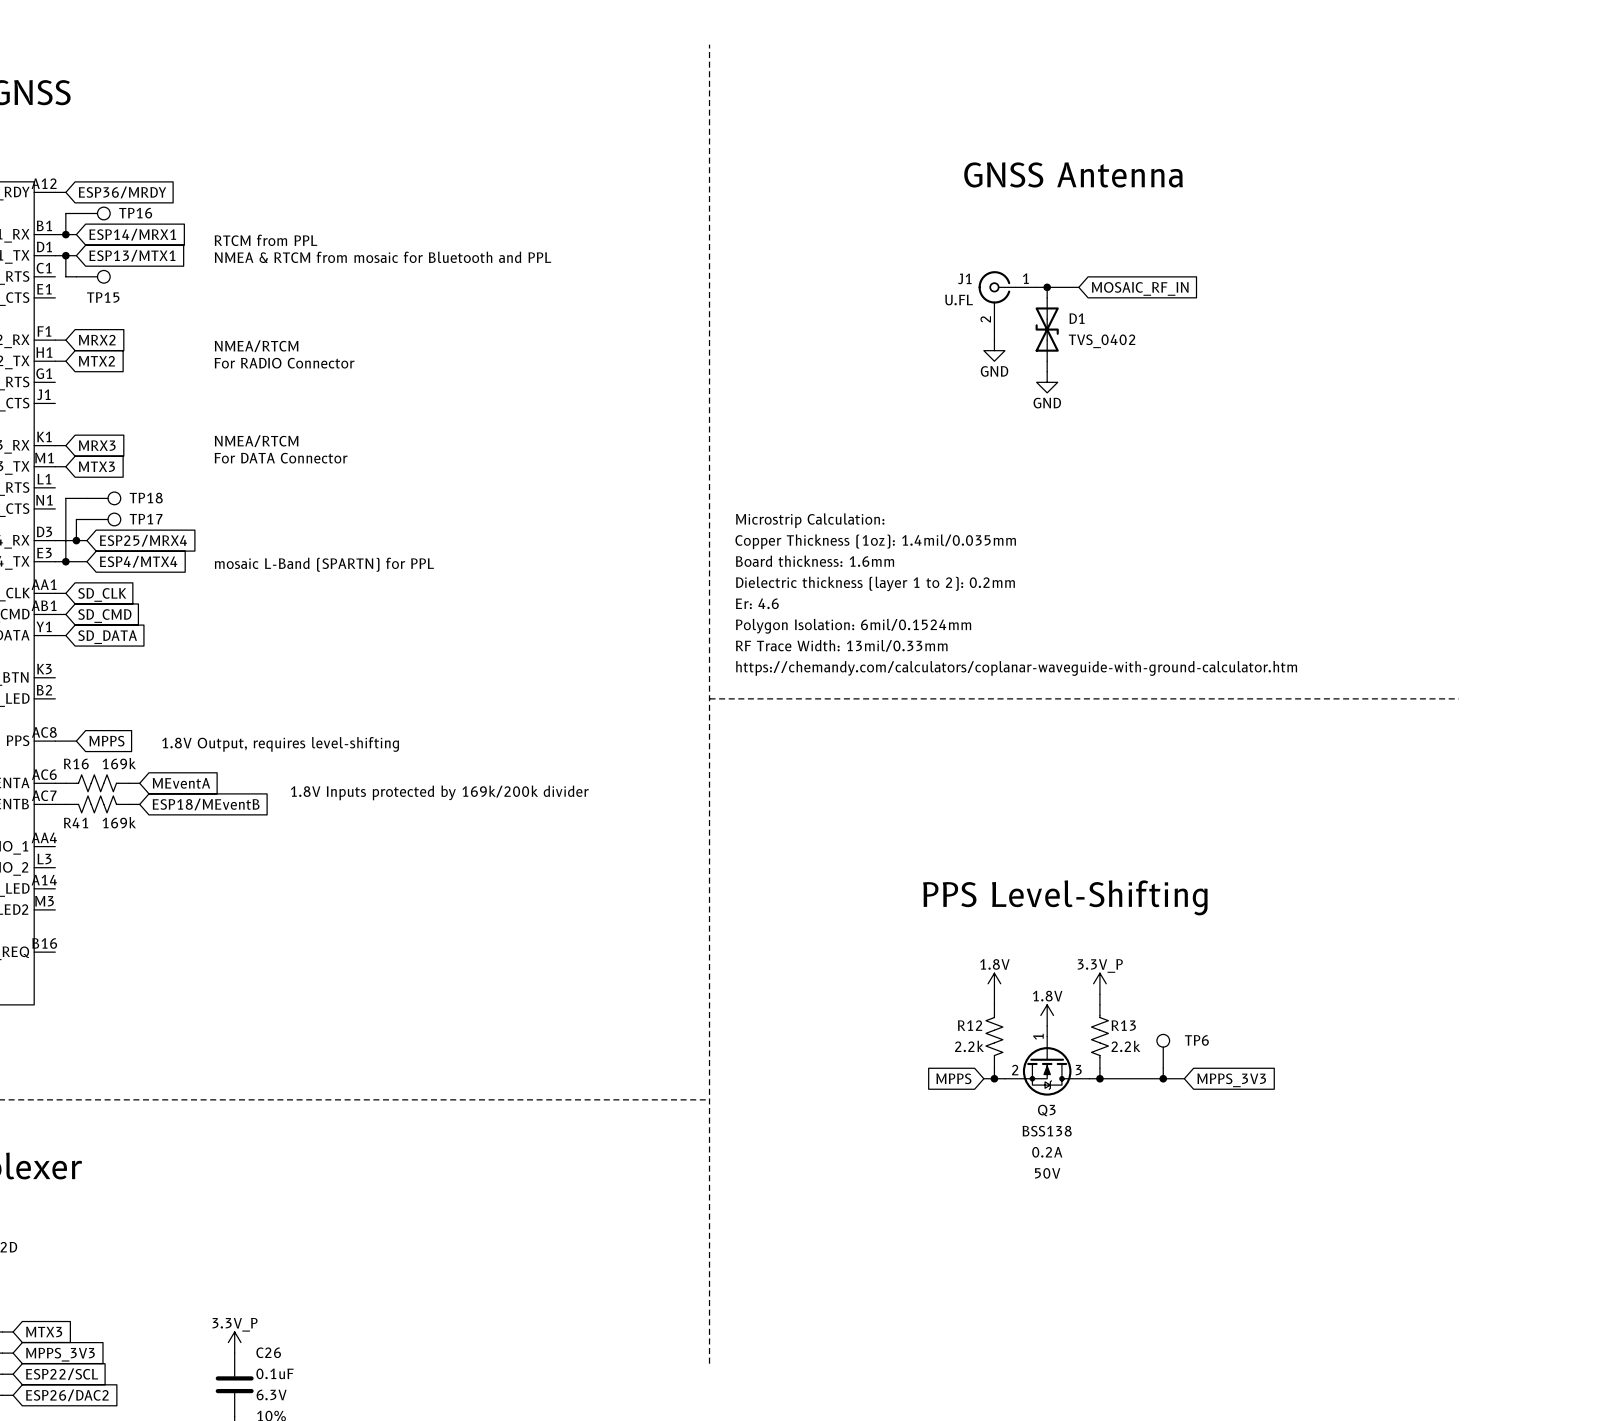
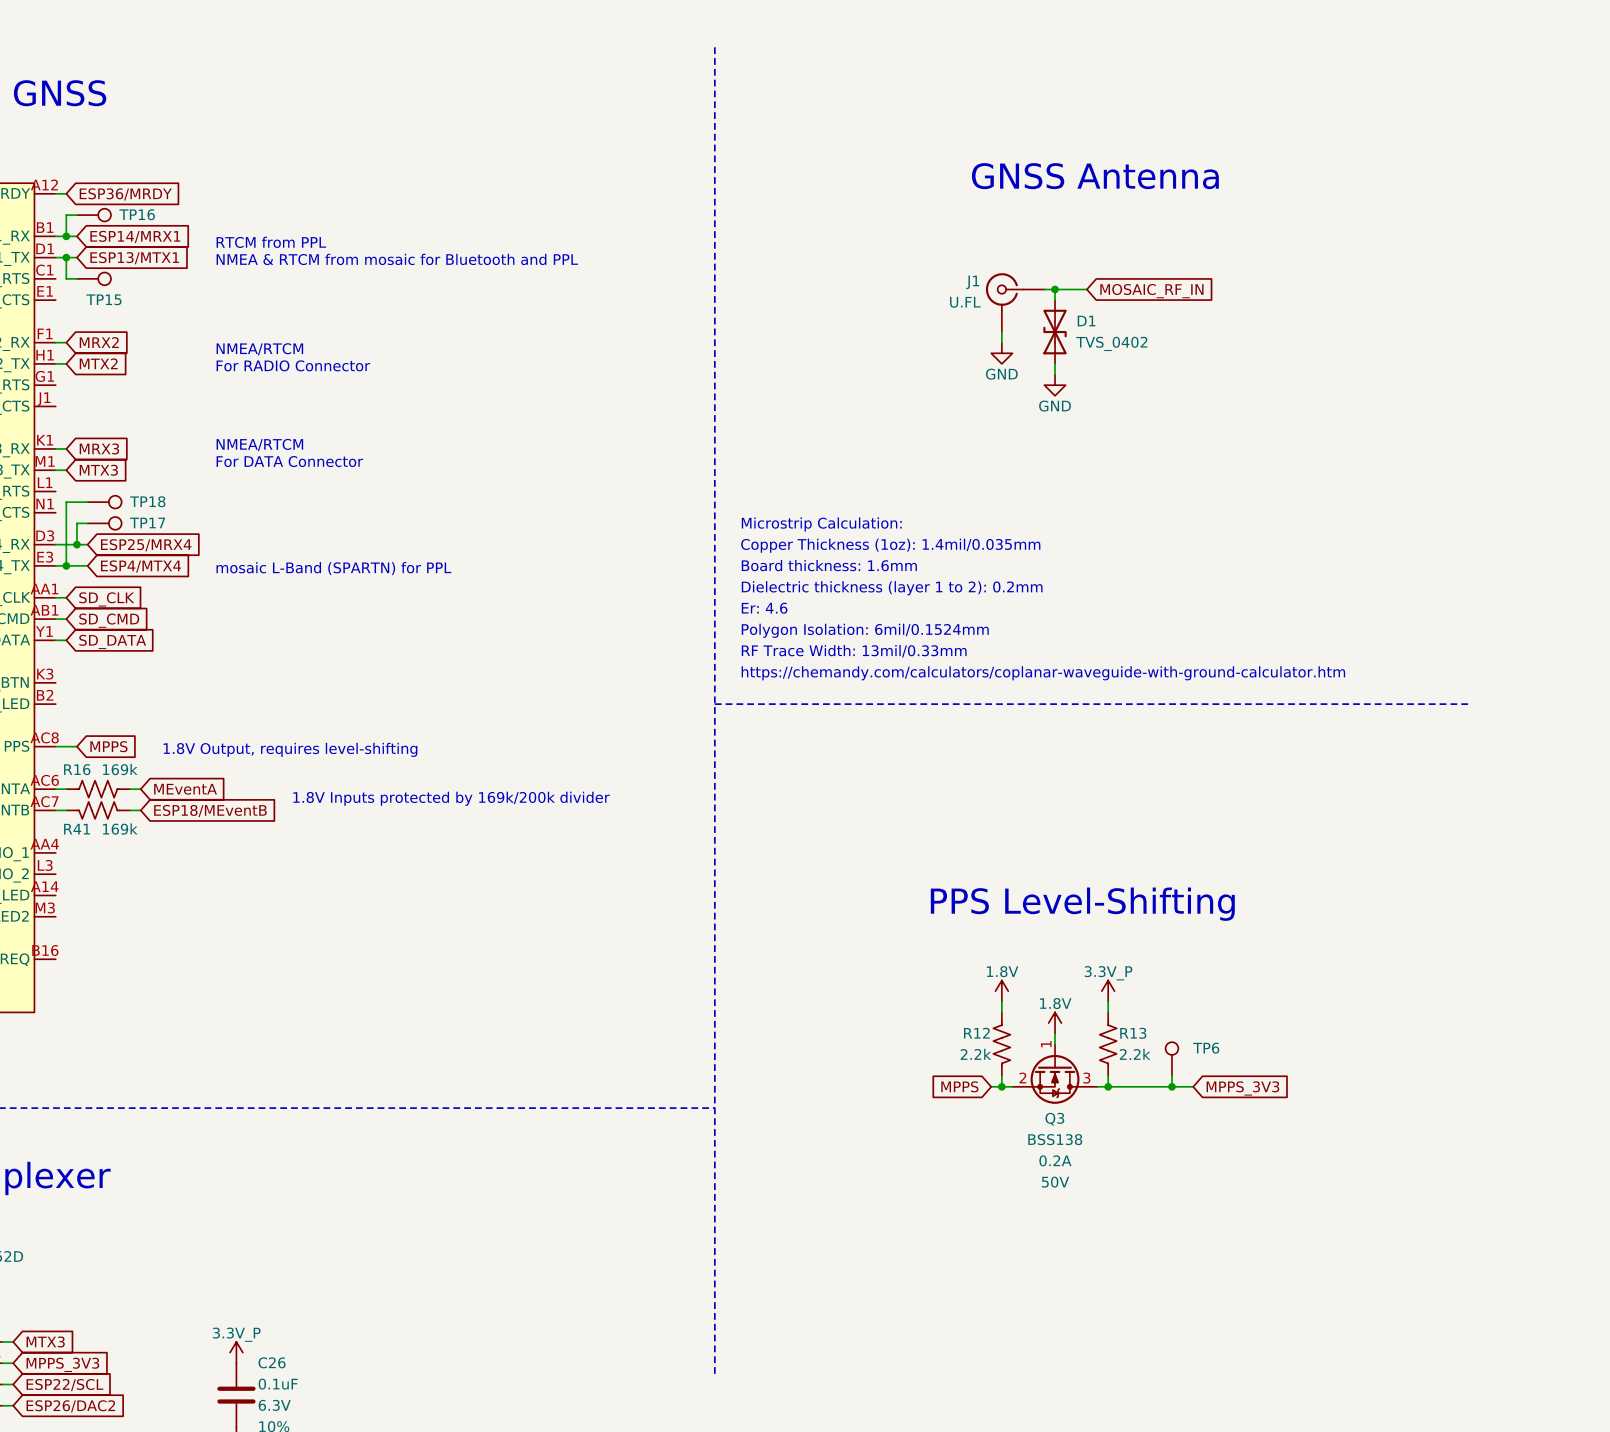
J1 pin number: 1 (1025, 278) -> none
J1 pin number: 2 (985, 319) -> none

